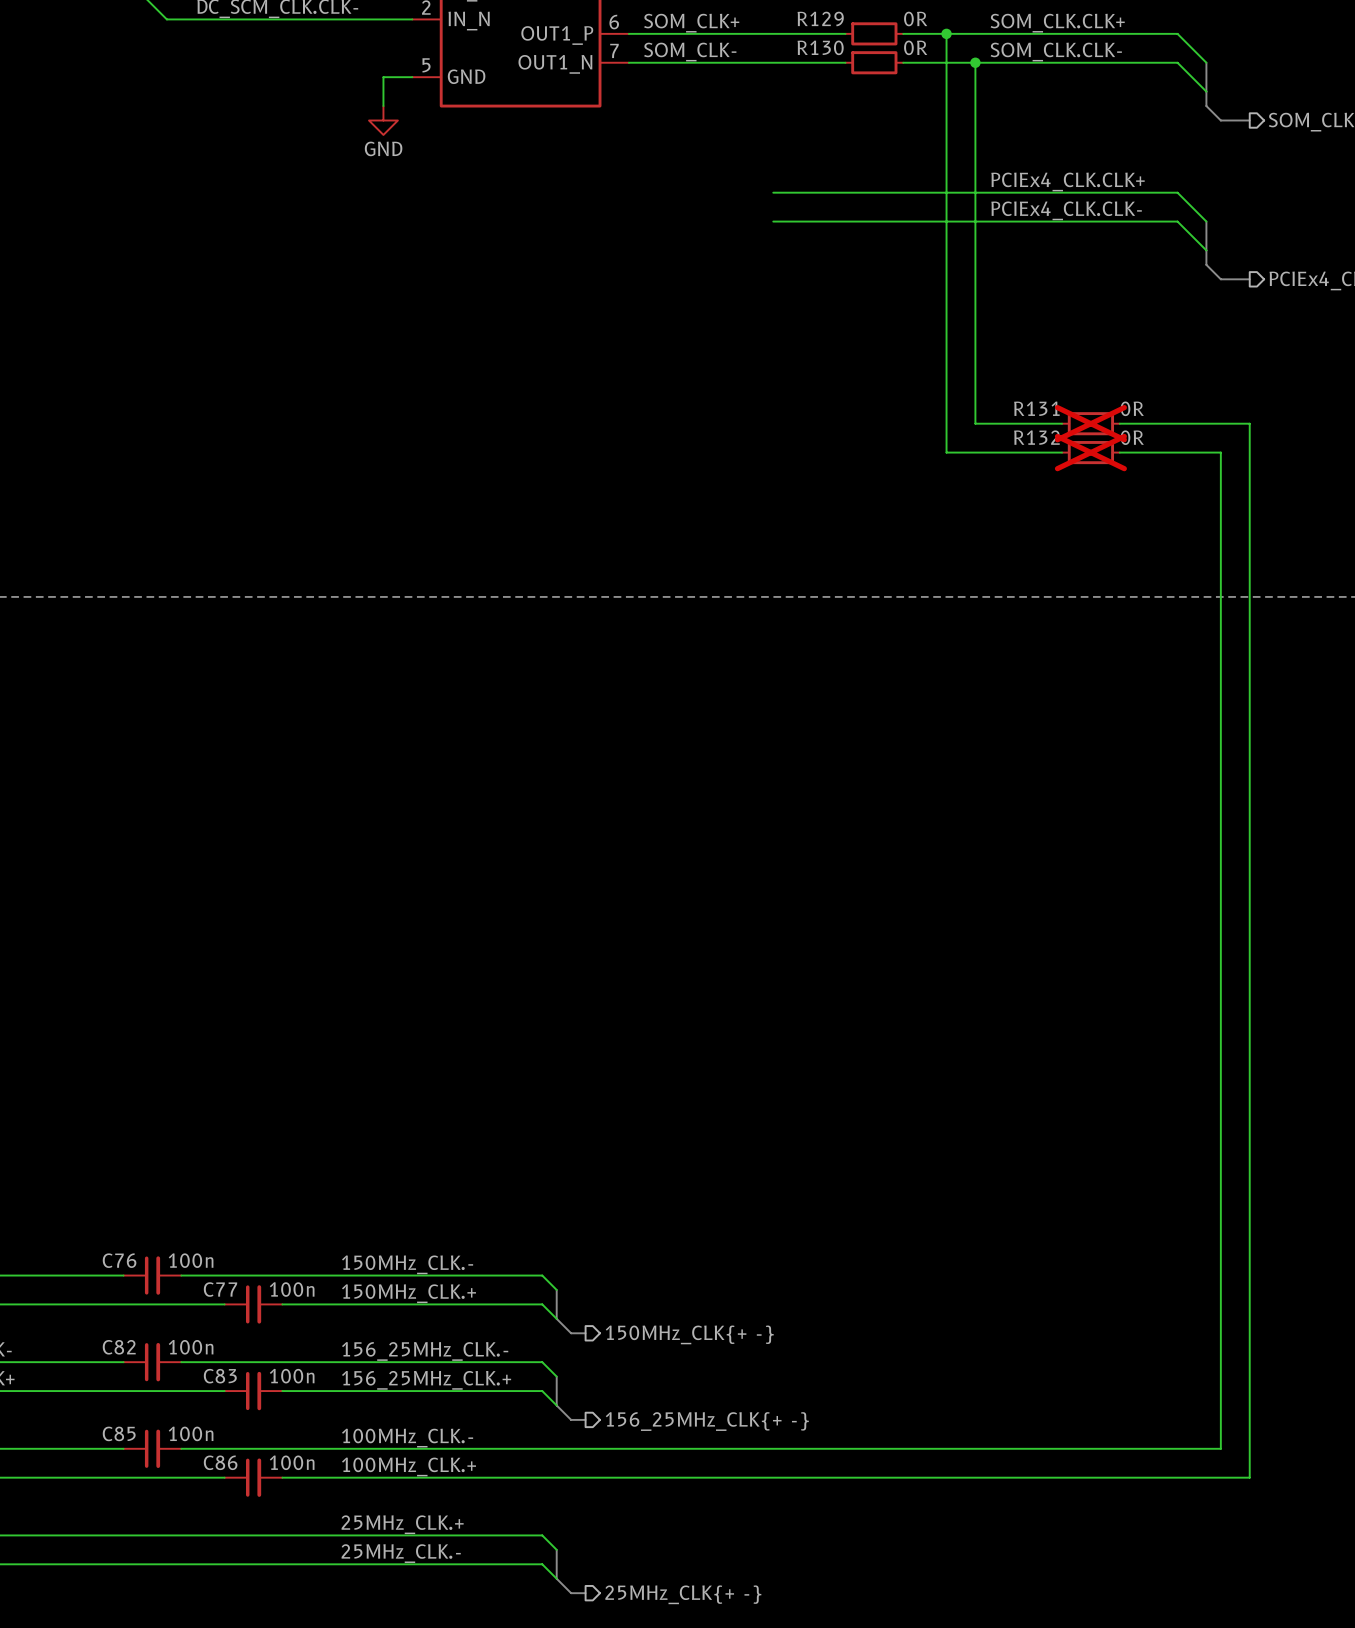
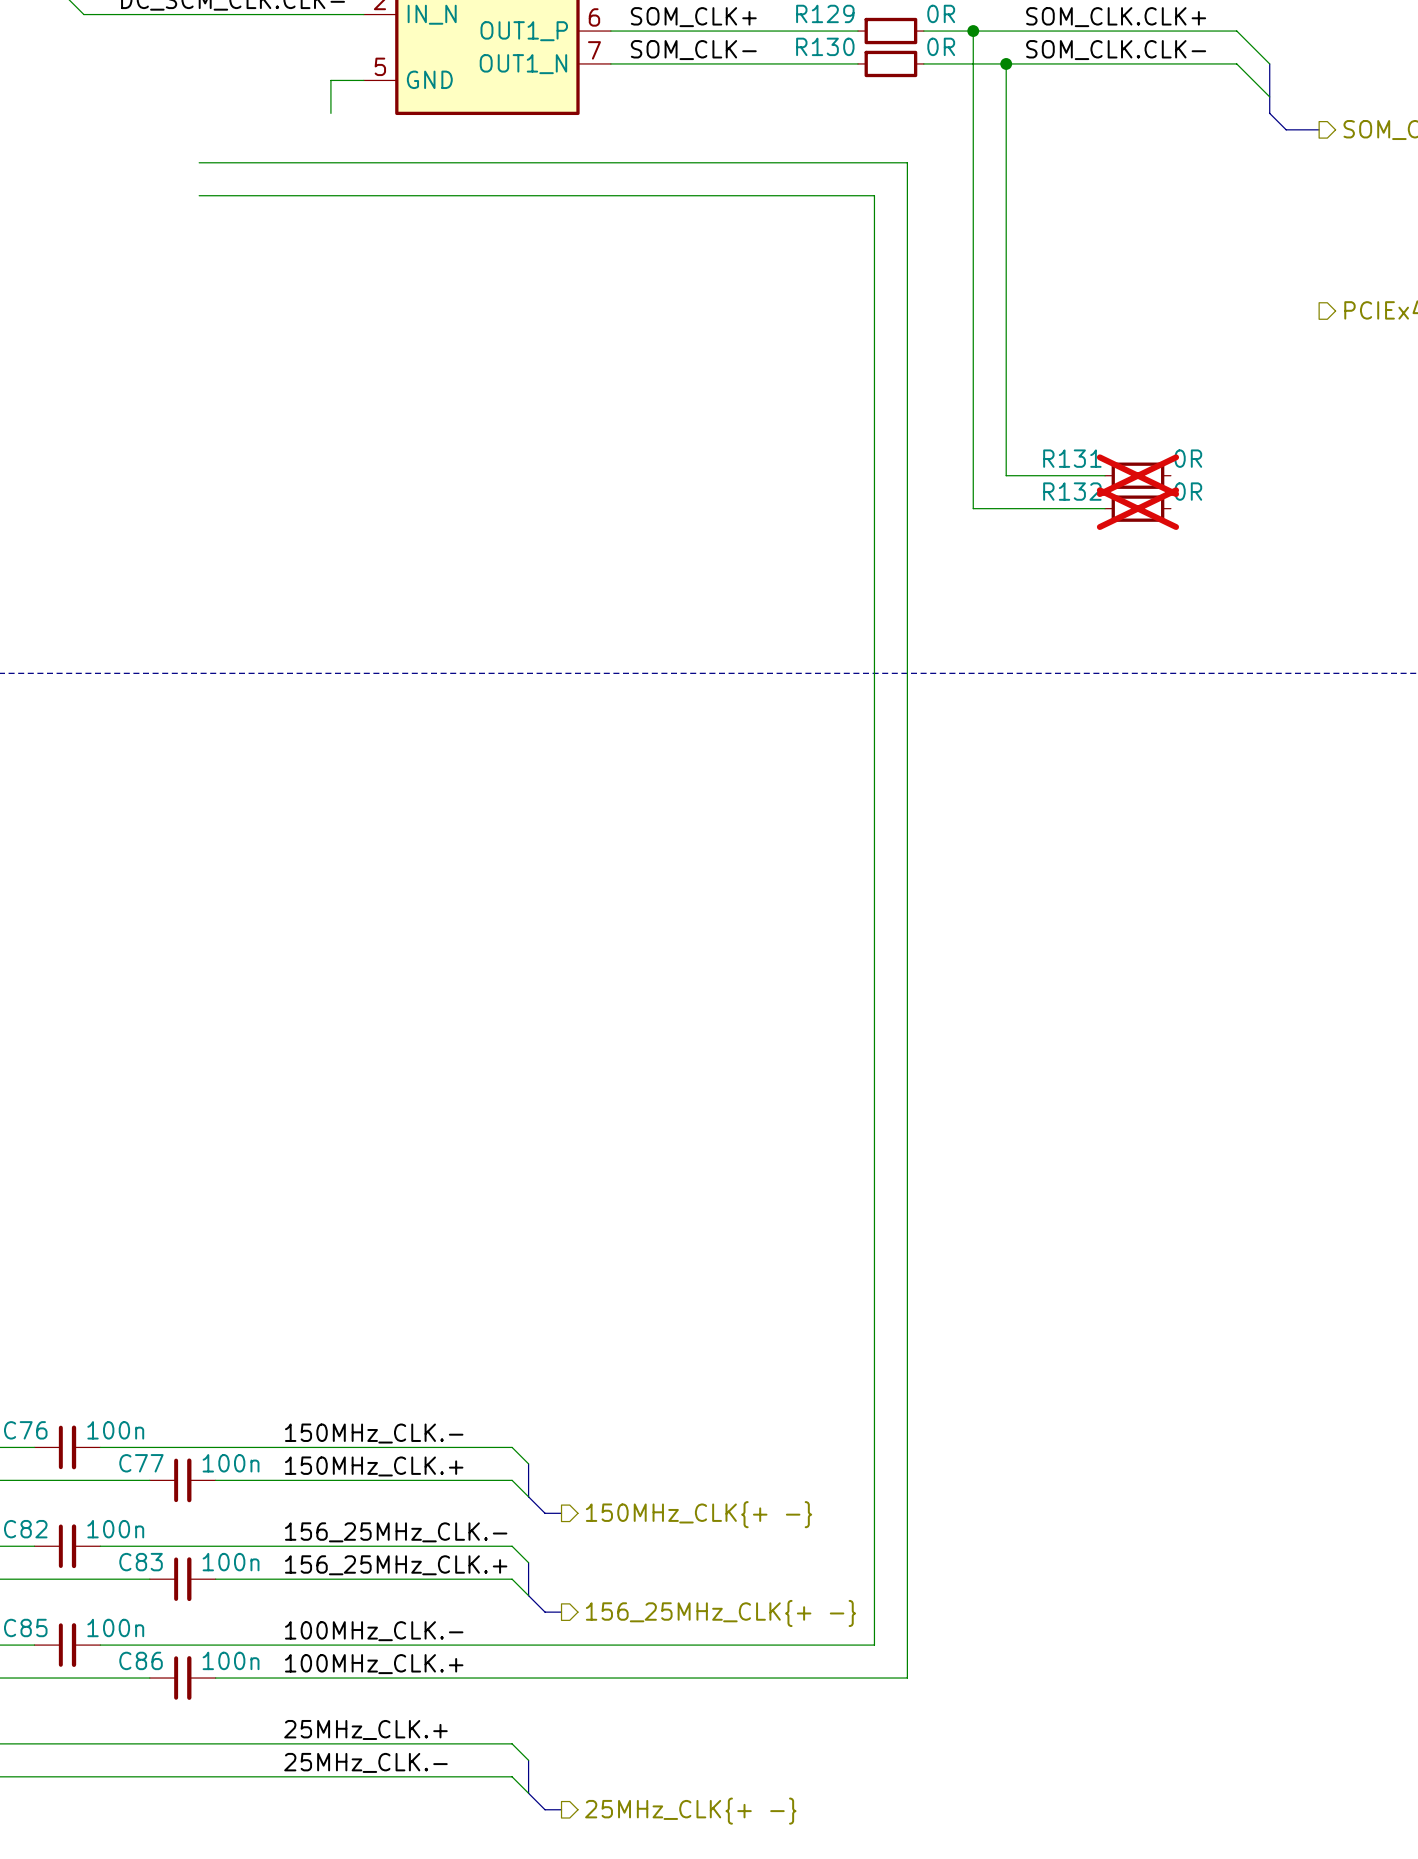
power symbol: GND (383, 120) -> none
label: PCIEx4_CLK.CLK+ (1068, 181) -> none
wire: (773, 192) (1177, 192) (1206, 221) -> none
label: PCIEx4_CLK.CLK- (1066, 210) -> none
wire: (773, 221) (1177, 221) (1206, 250) -> none
bus: (1206, 221) (1206, 264) (1220, 279) (1249, 279) -> none
wire: (1119, 423) (1249, 423) (1249, 1477) (888, 1477) -> (199, 162) (907, 162) (907, 1678)
wire: (1119, 452) (1220, 452) (1220, 1448) (859, 1448) -> (199, 195) (874, 195) (874, 1645)

